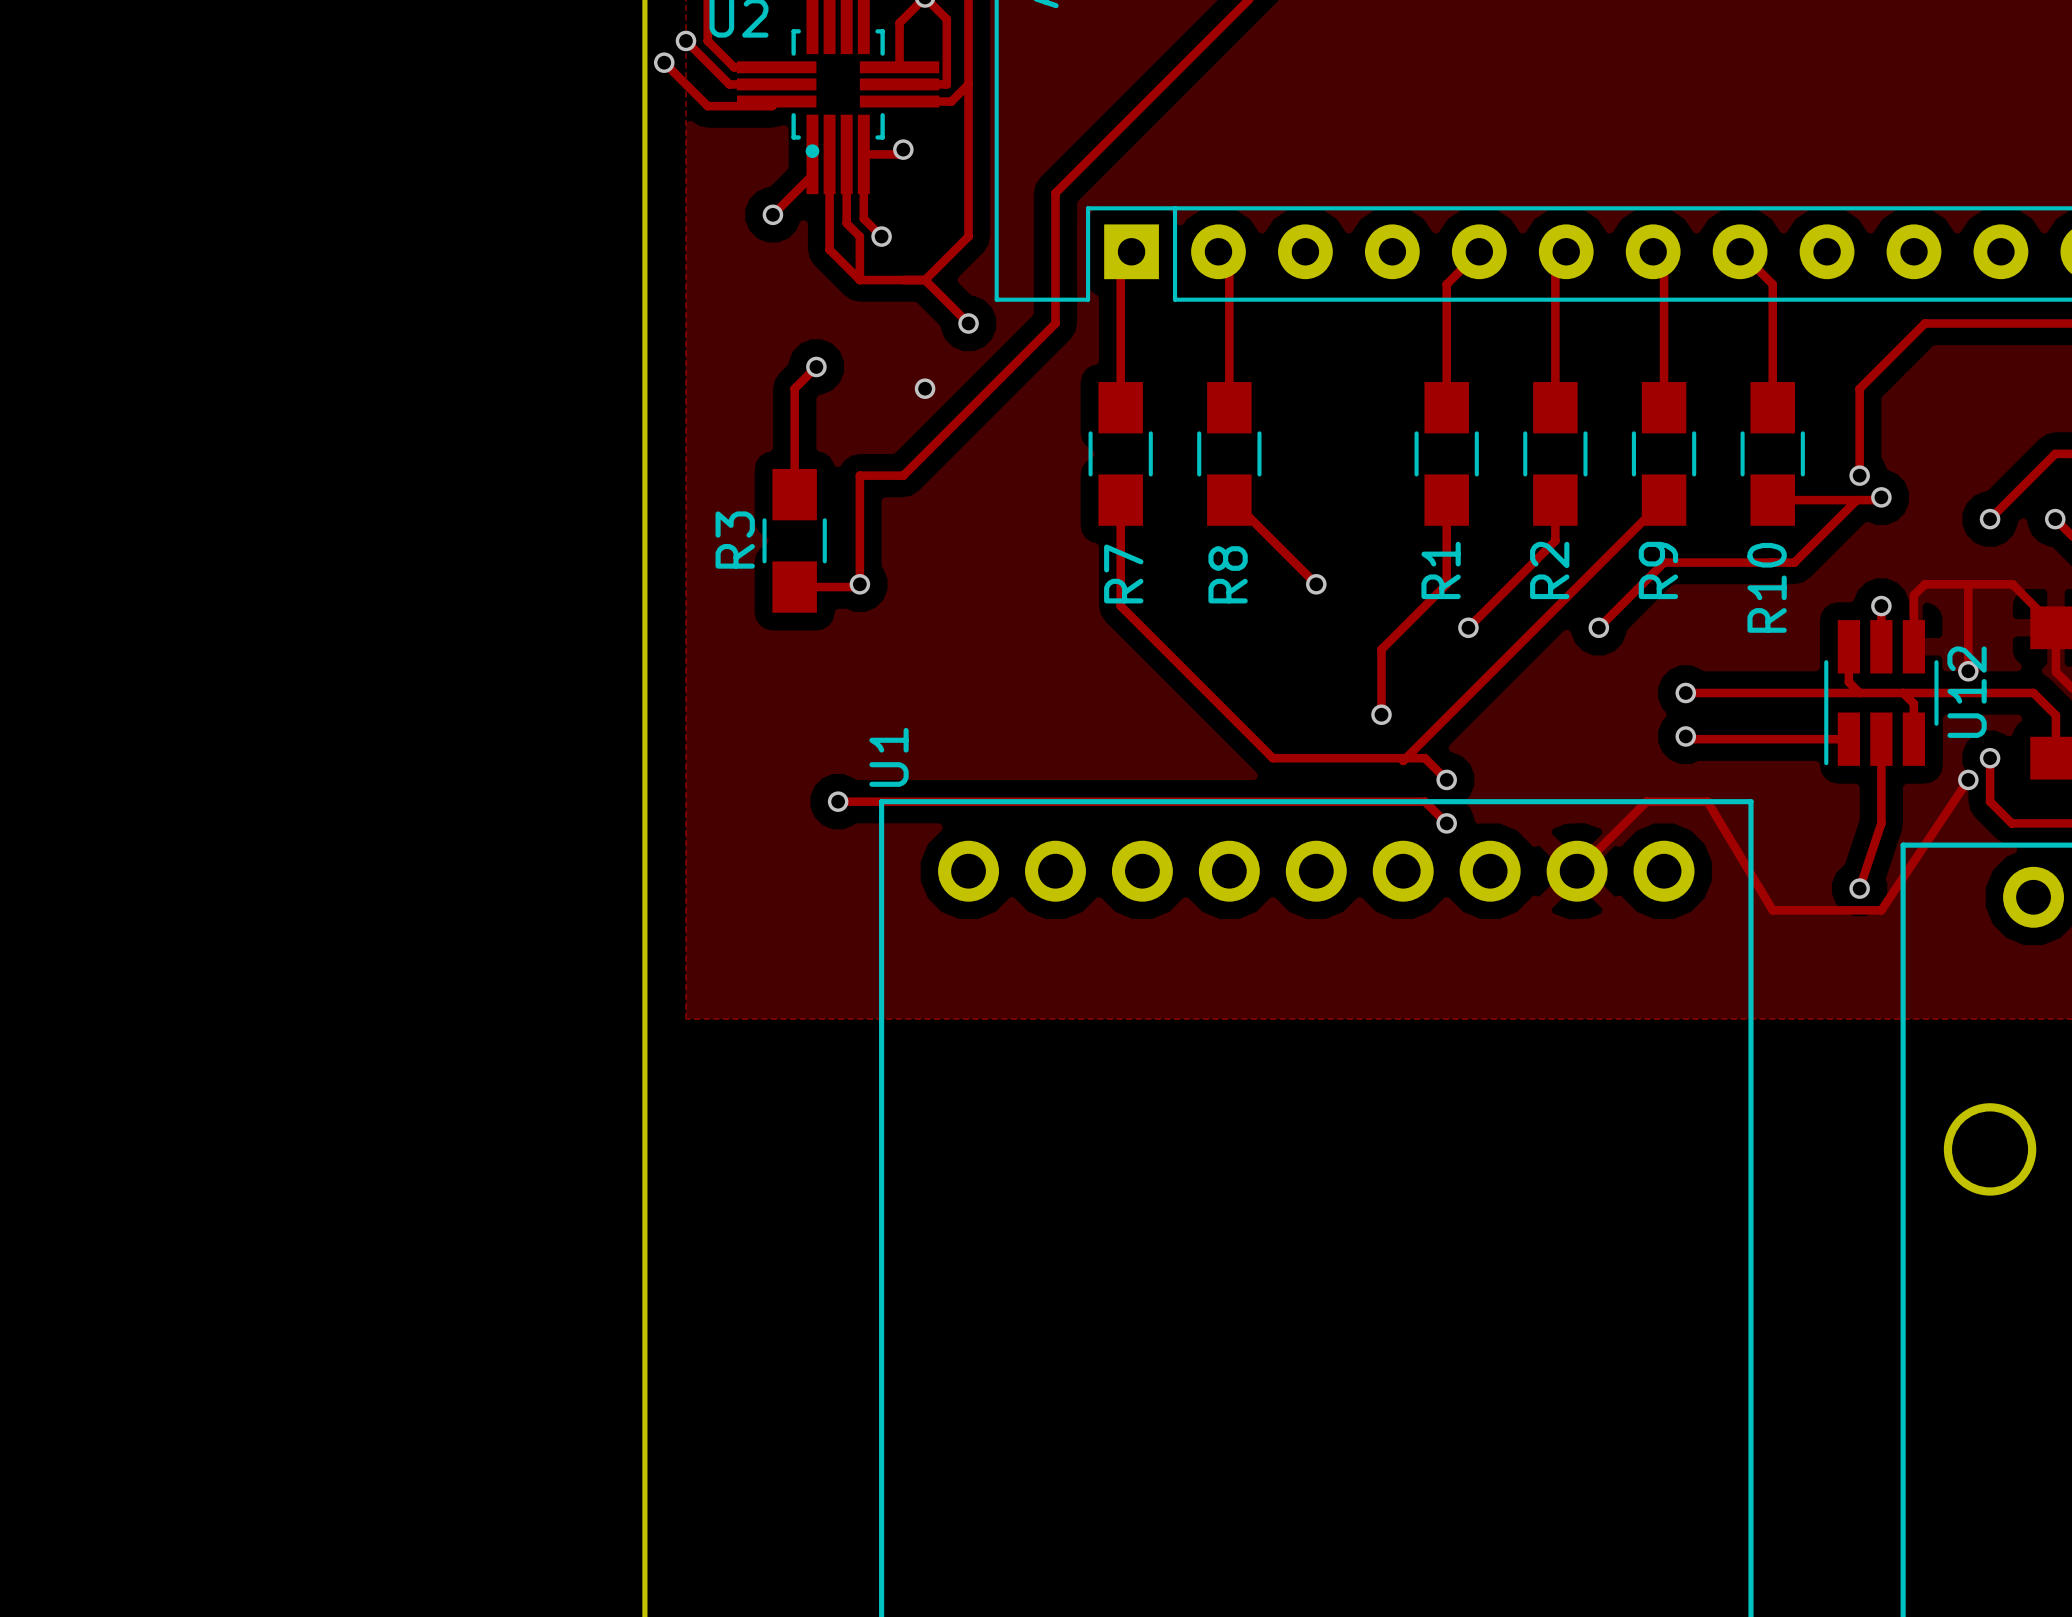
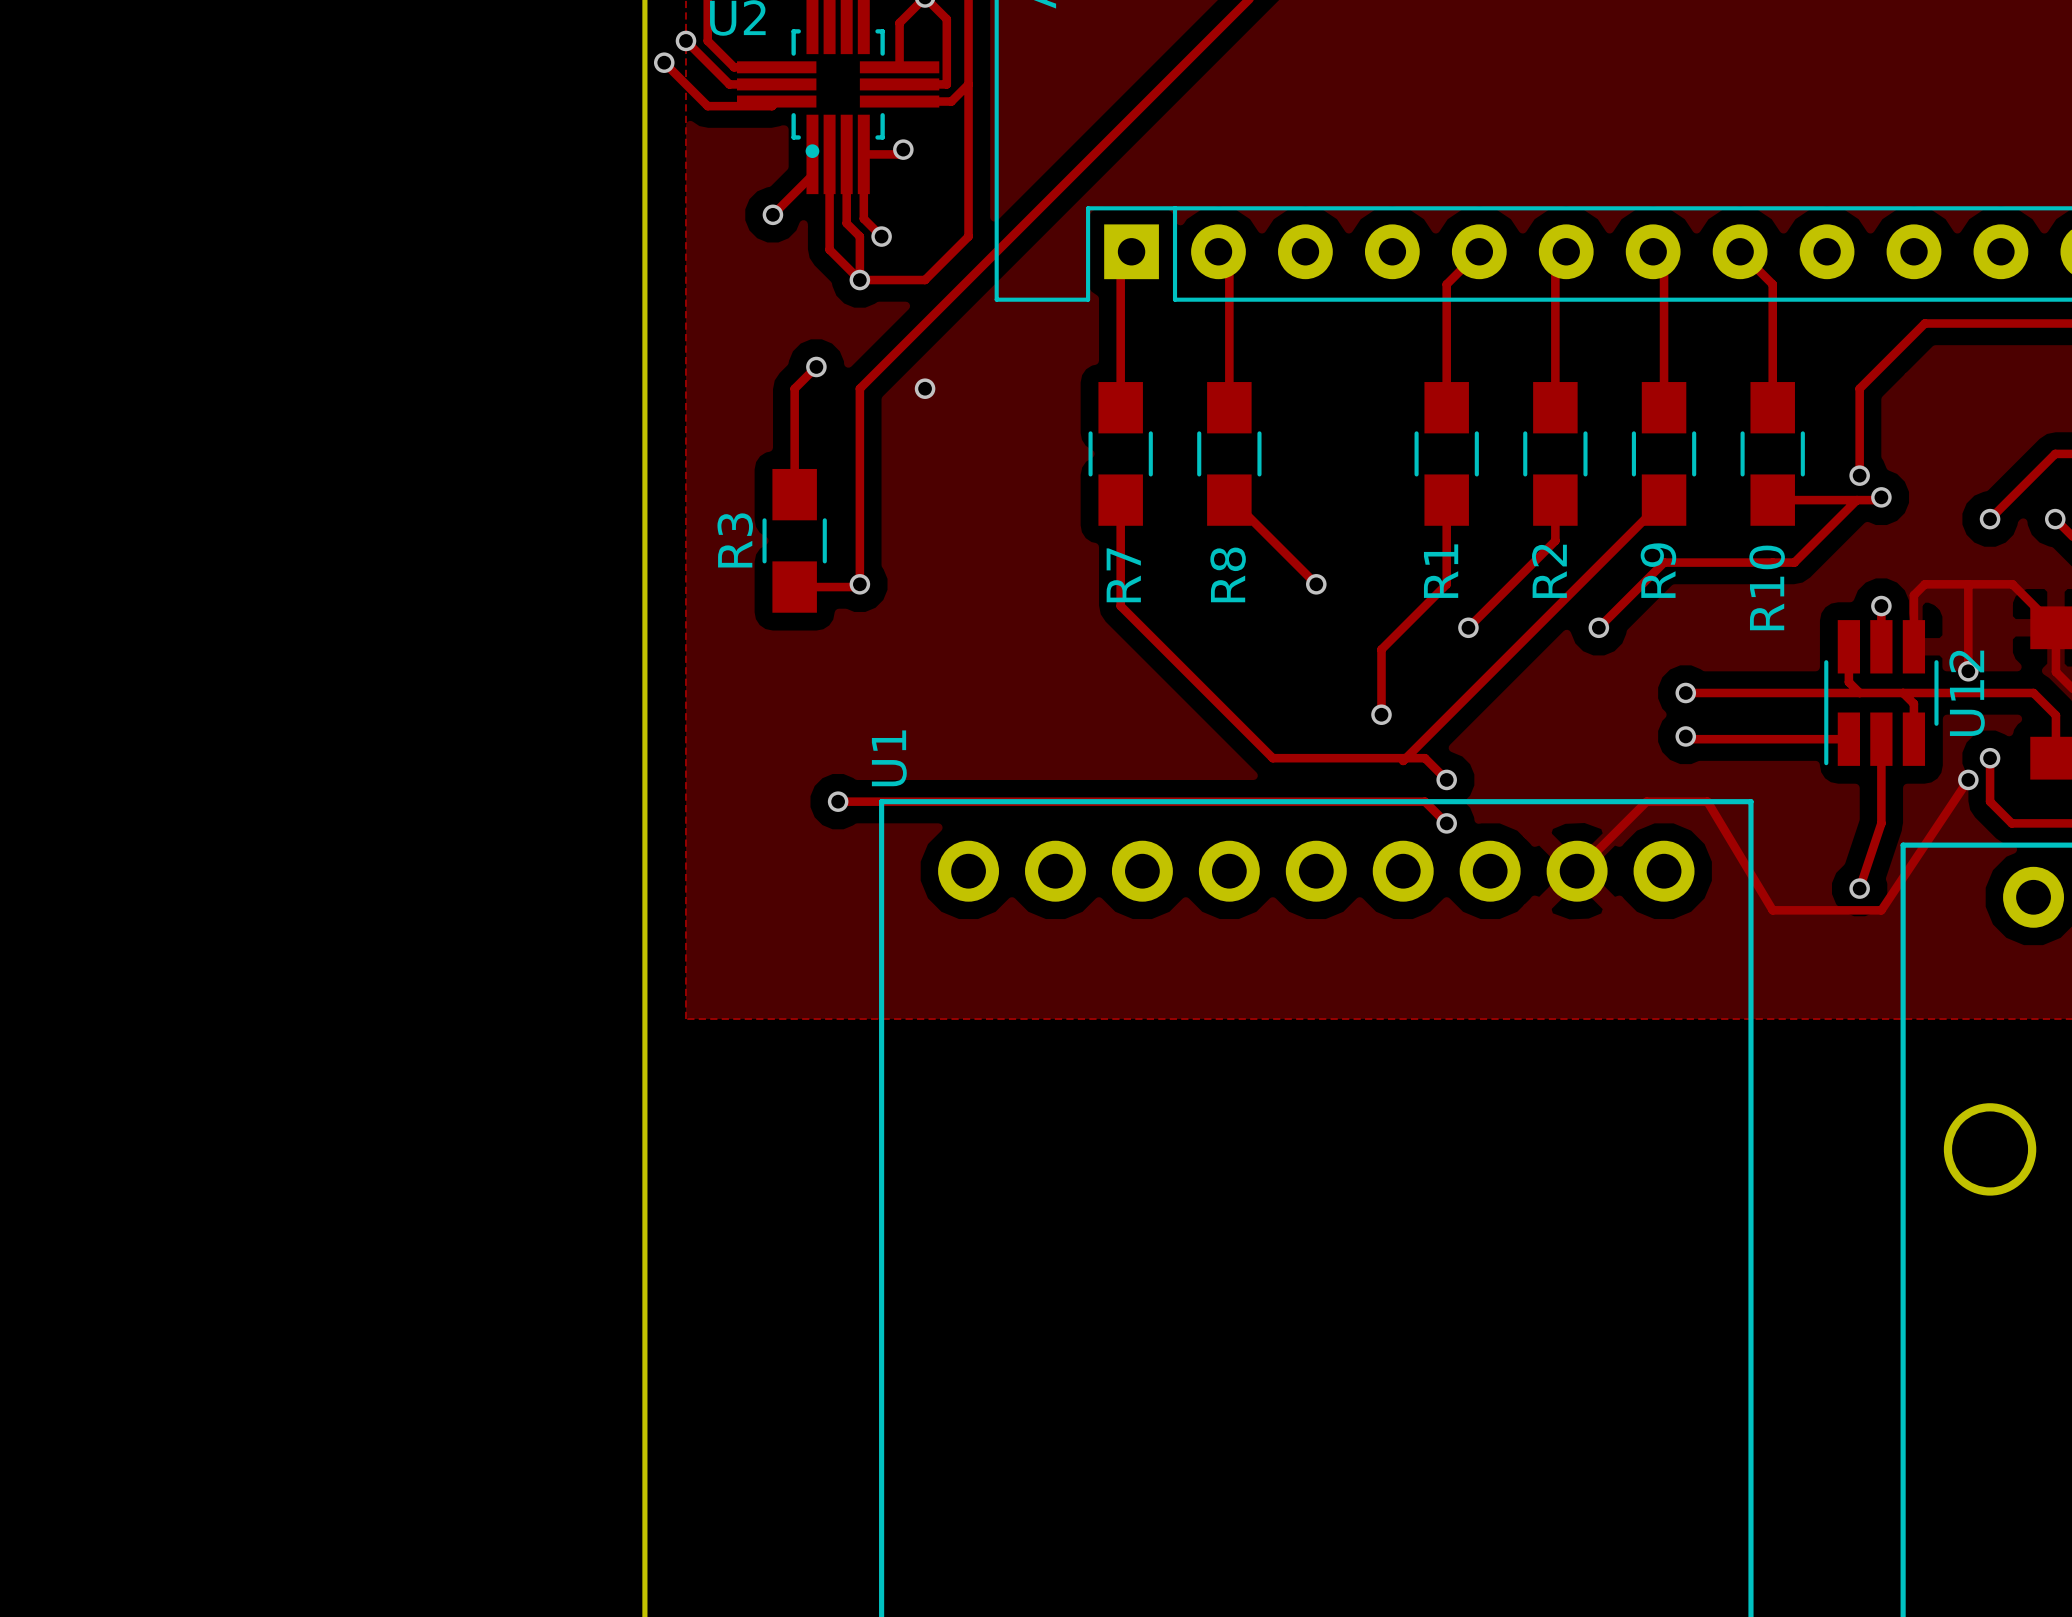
track: (1055, 193) (1055, 323) (903, 475) (859, 475) -> (1055, 193) (859, 388) (859, 475)
track: (925, 280) (968, 323) -> none
via position: (968, 323) -> (859, 280)

